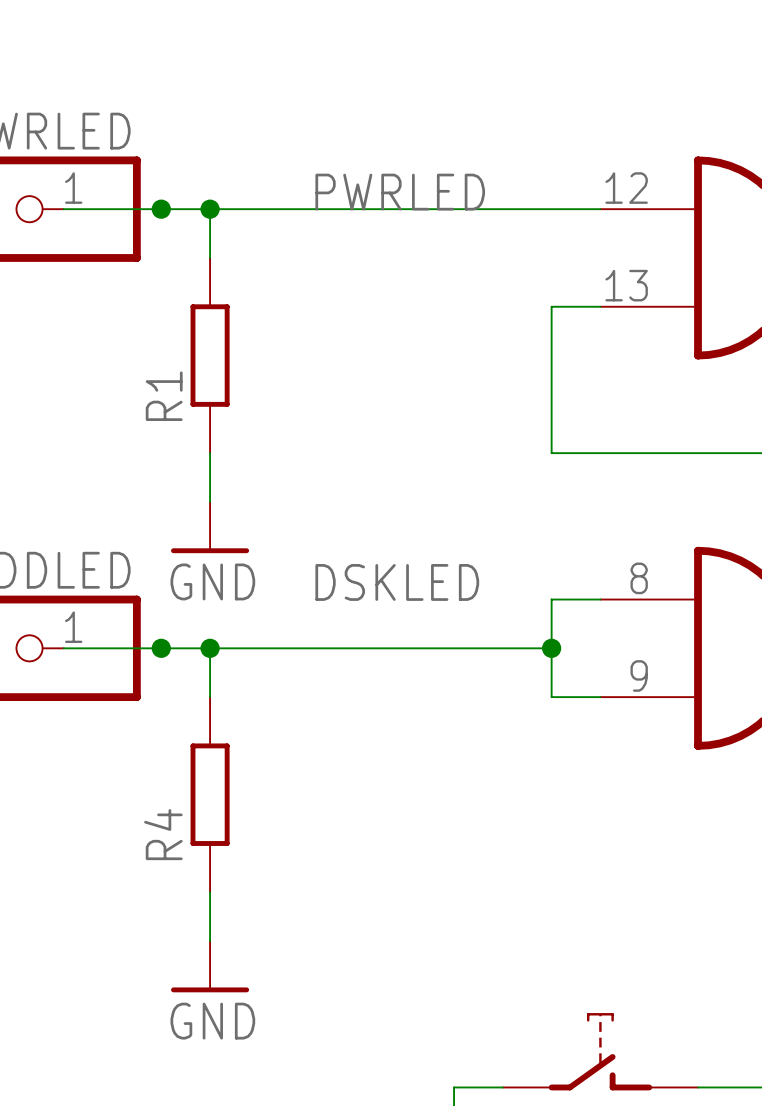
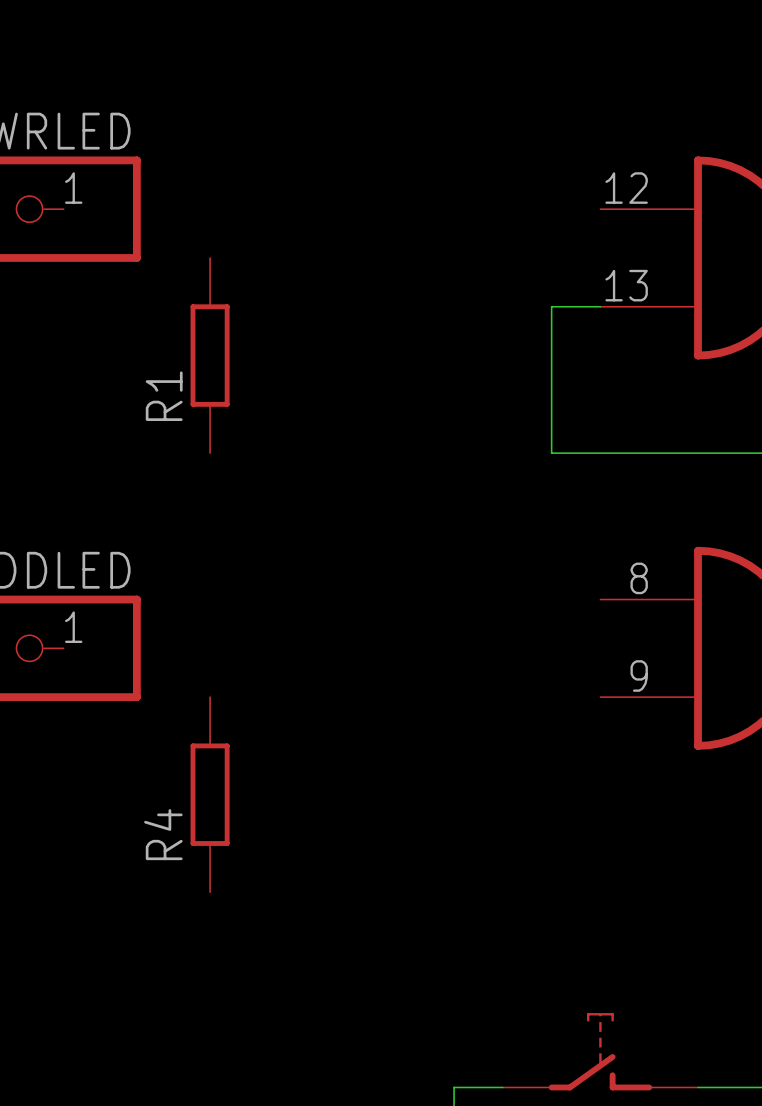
label: PWRLED (400, 192) -> none
wire: (63, 209) (600, 209) -> none
junction: (161, 209) -> none
wire: (210, 209) (210, 257) -> none
junction: (210, 209) -> none
wire: (210, 453) (210, 501) -> none
power symbol: GND (210, 527) -> none
label: DSKLED (397, 582) -> none
wire: (600, 599) (551, 599) (551, 697) (600, 697) -> none
wire: (63, 648) (551, 648) -> none
junction: (161, 648) -> none
wire: (210, 648) (210, 697) -> none
junction: (210, 648) -> none
junction: (551, 648) -> none
wire: (210, 892) (210, 941) -> none
power symbol: GND (210, 966) -> none

